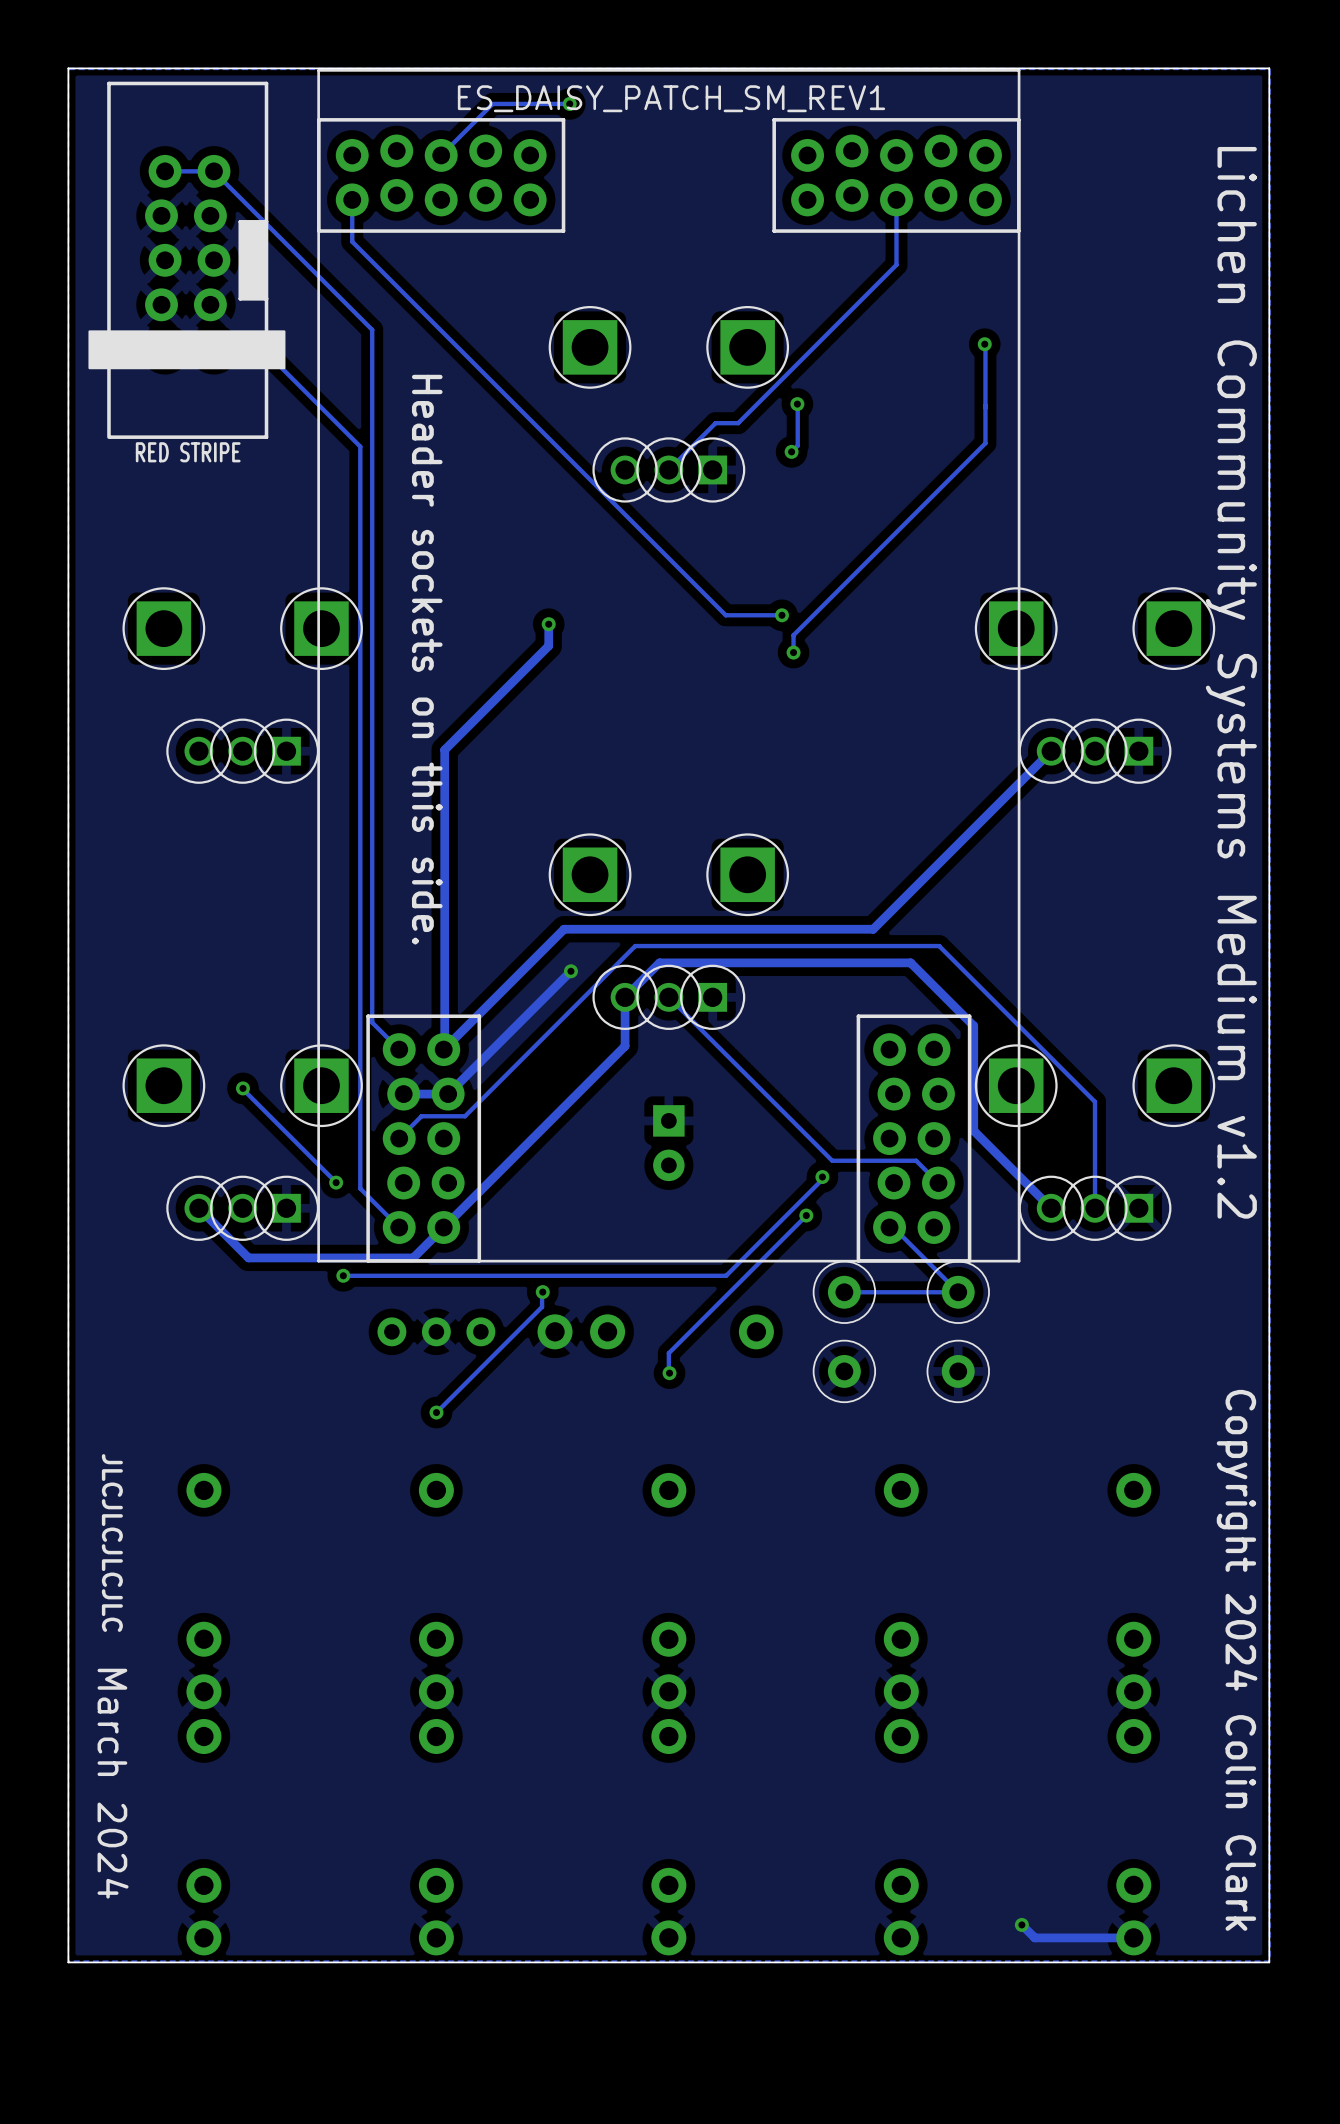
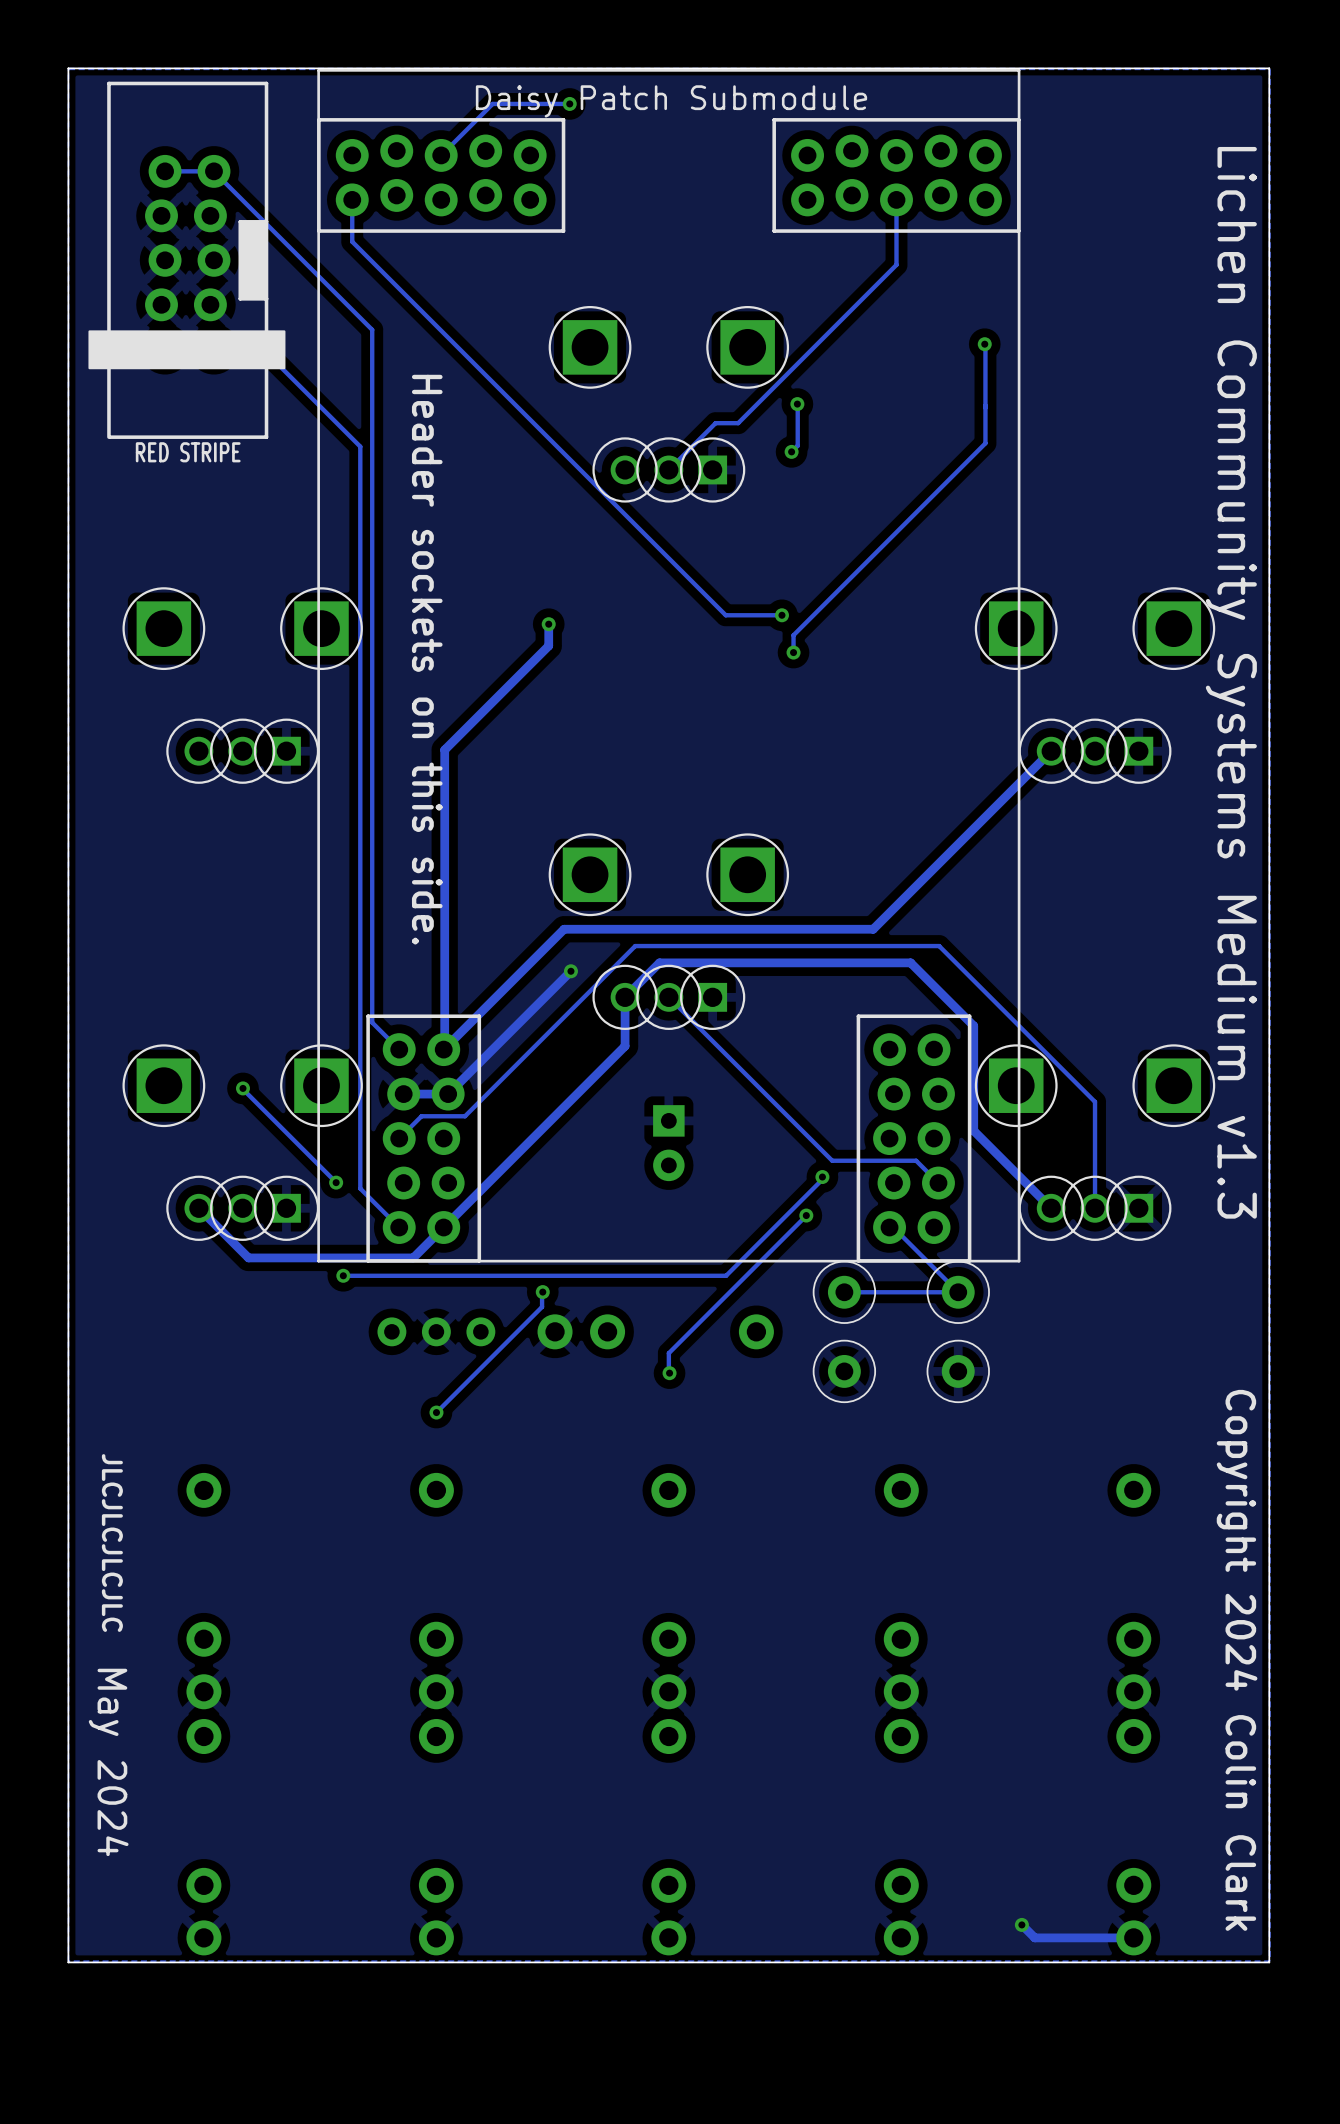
part value: ES_DAISY_PATCH_SM_REV1 (671, 98) -> Daisy Patch Submodule (671, 101)
text: Lichen Community Systems Medium v1.2 (1231, 682) -> Lichen Community Systems Medium v1.3 (1231, 682)
text: March 2024 (113, 1783) -> May 2024 (108, 1762)

